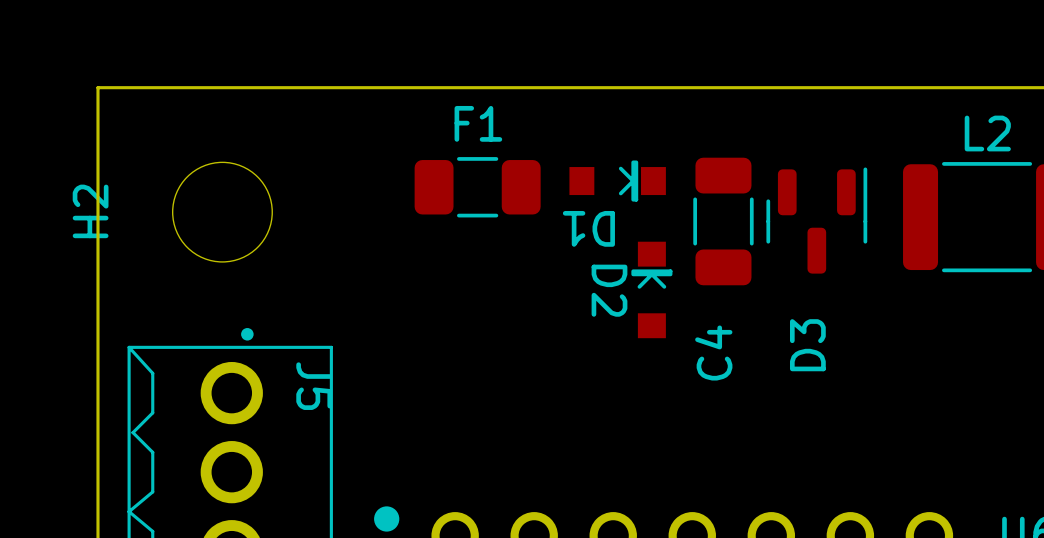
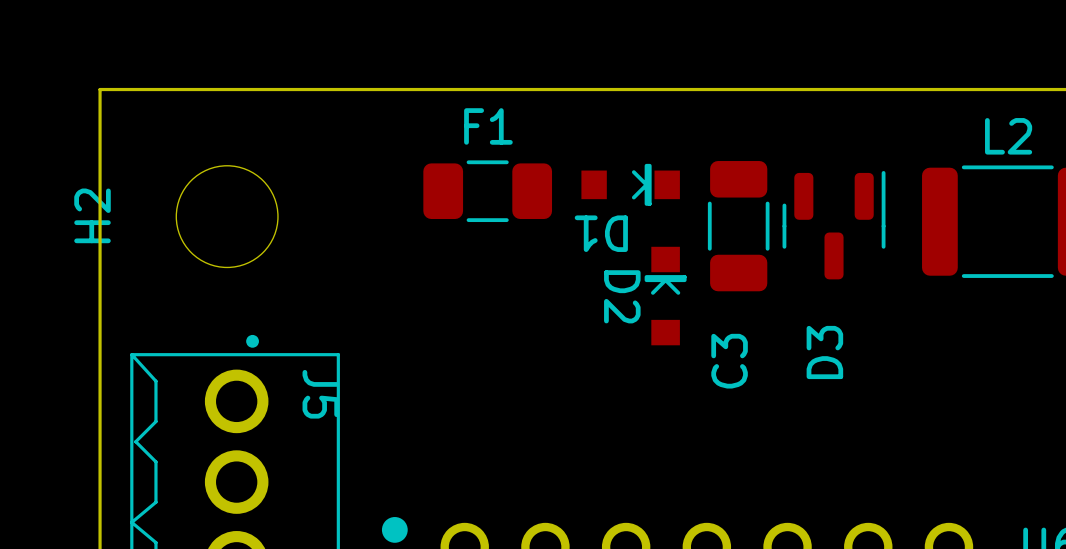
C4 name: C4 (713, 353) -> C3 (729, 361)

